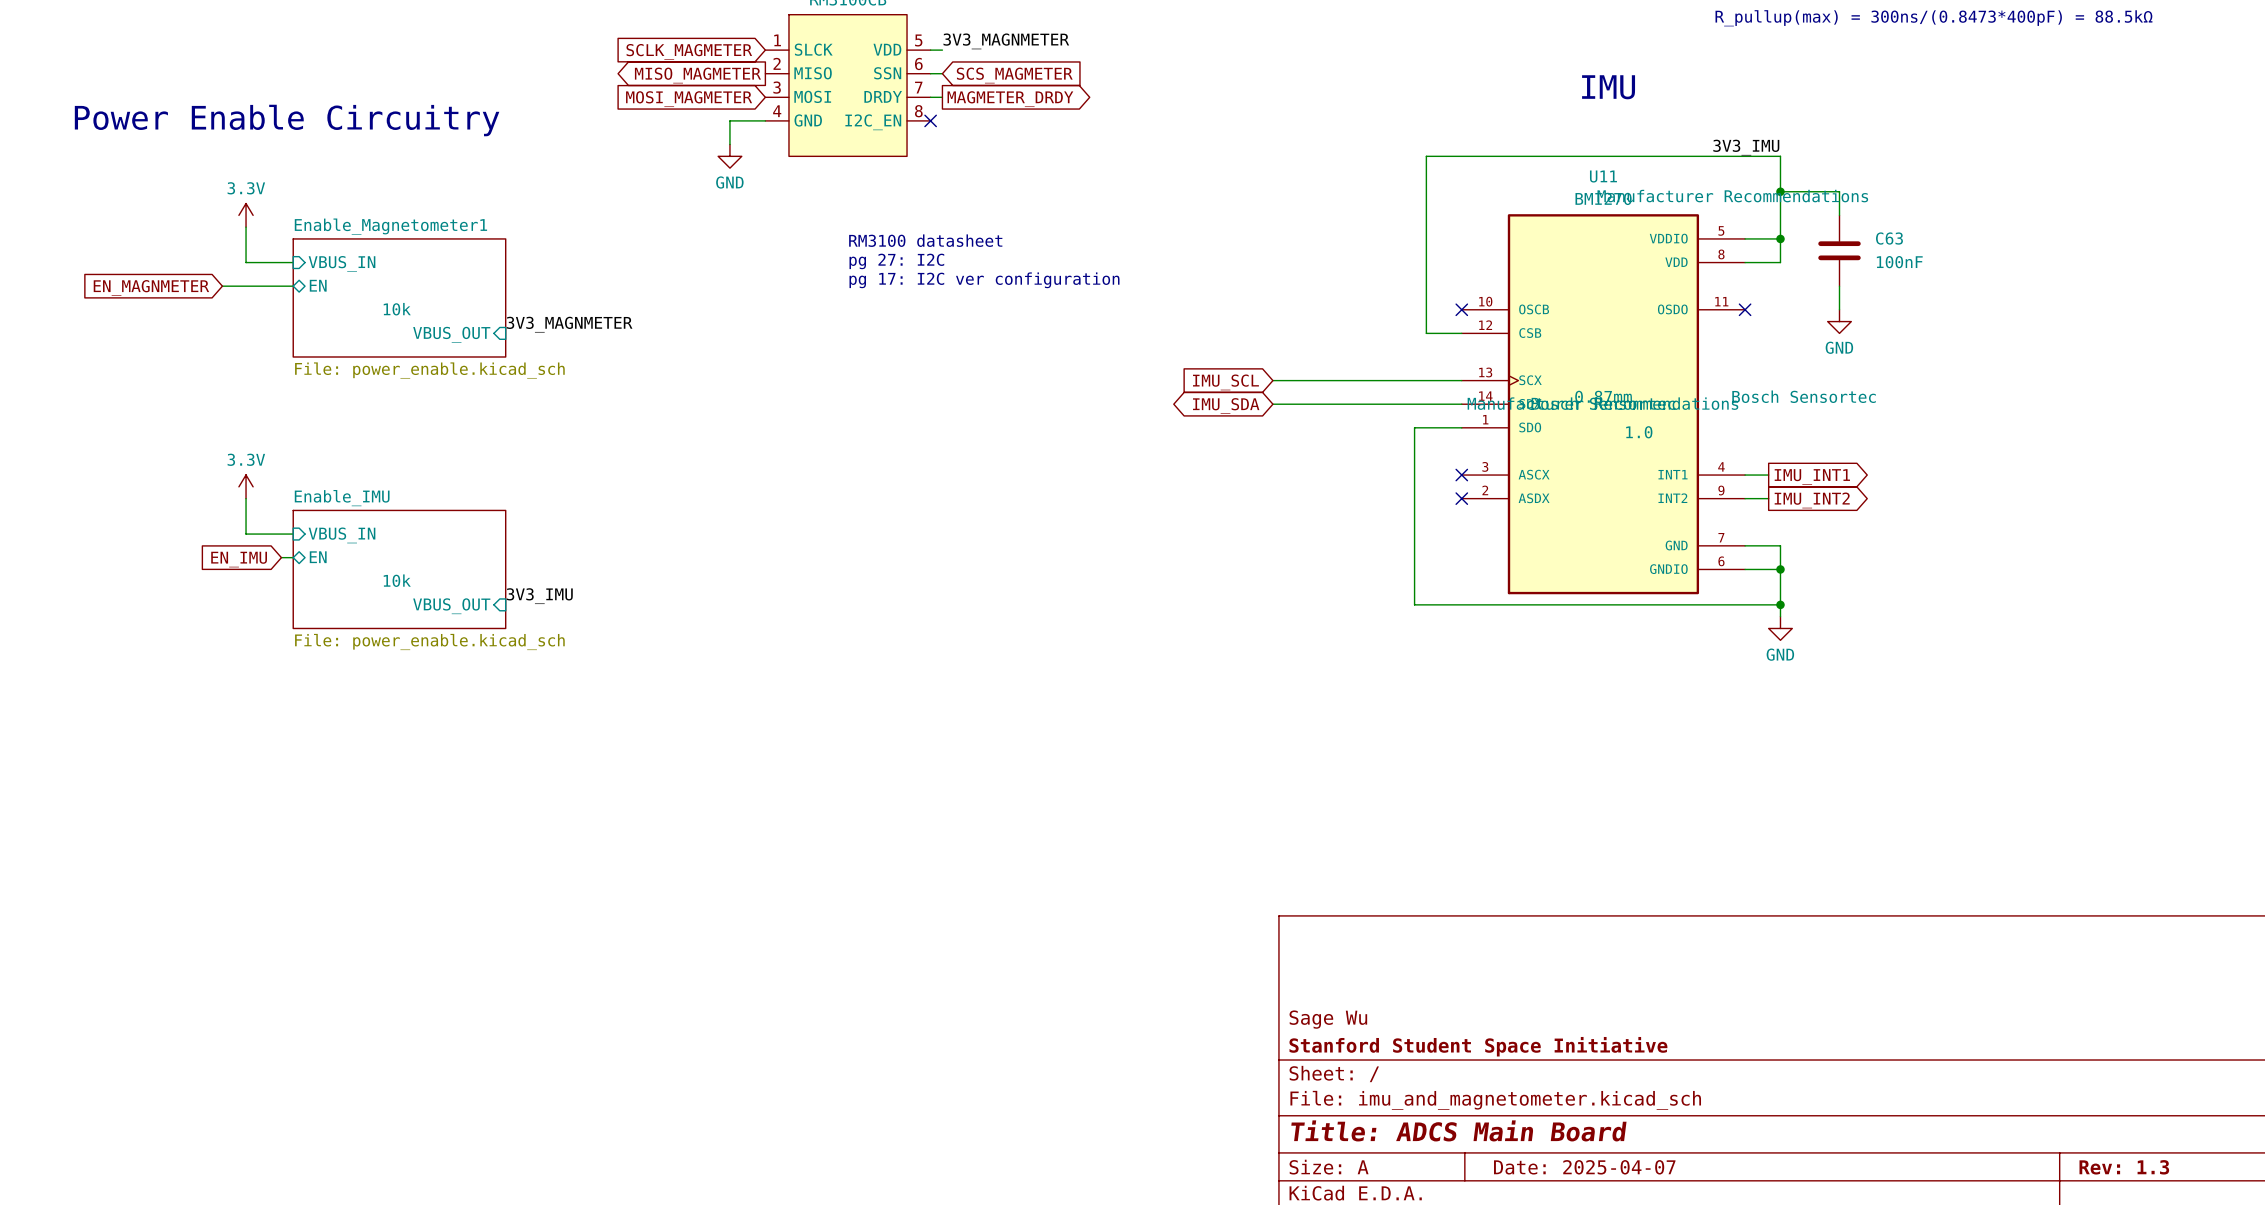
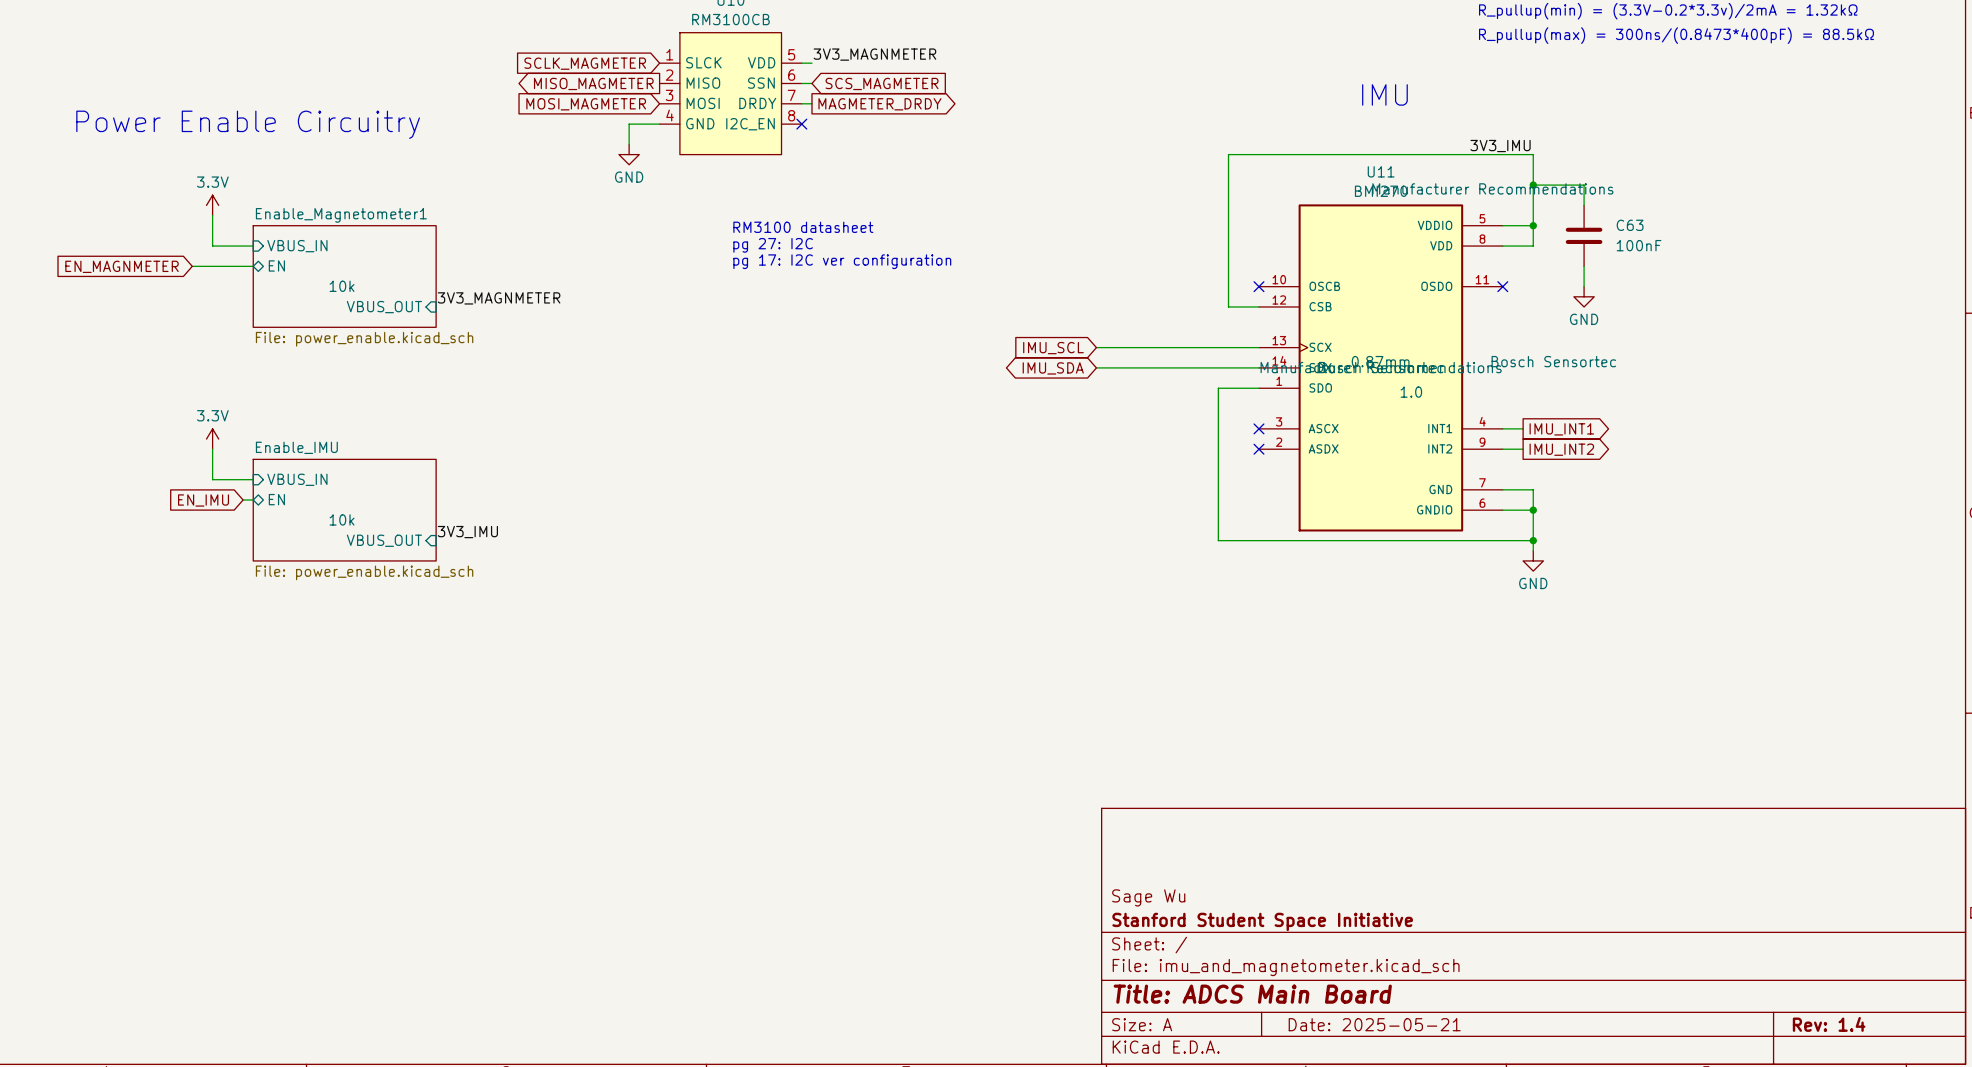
title block: Date: 2025-04-07 (1584, 1167) -> Date: 2025-05-21 (1374, 1024)
title block: Rev: 1.3 (2124, 1167) -> Rev: 1.4 (1829, 1024)

